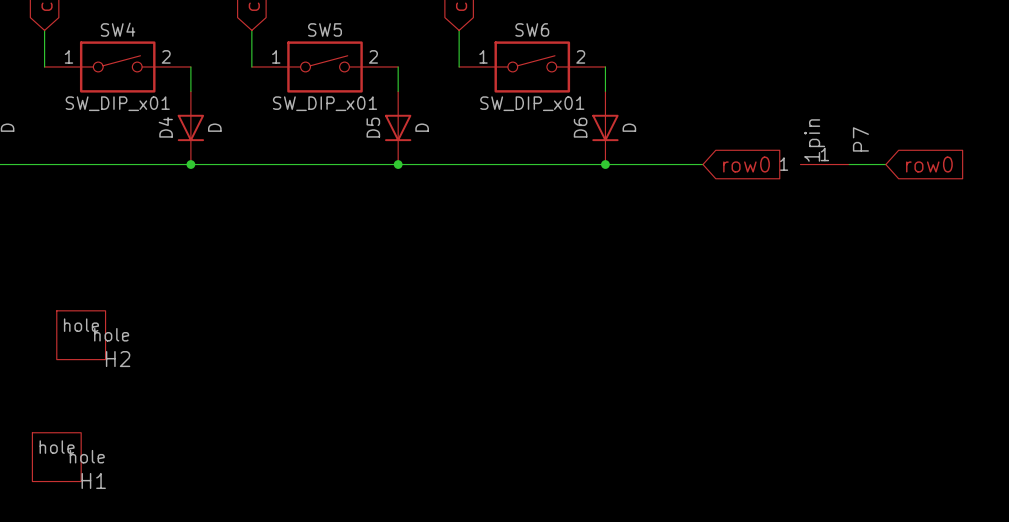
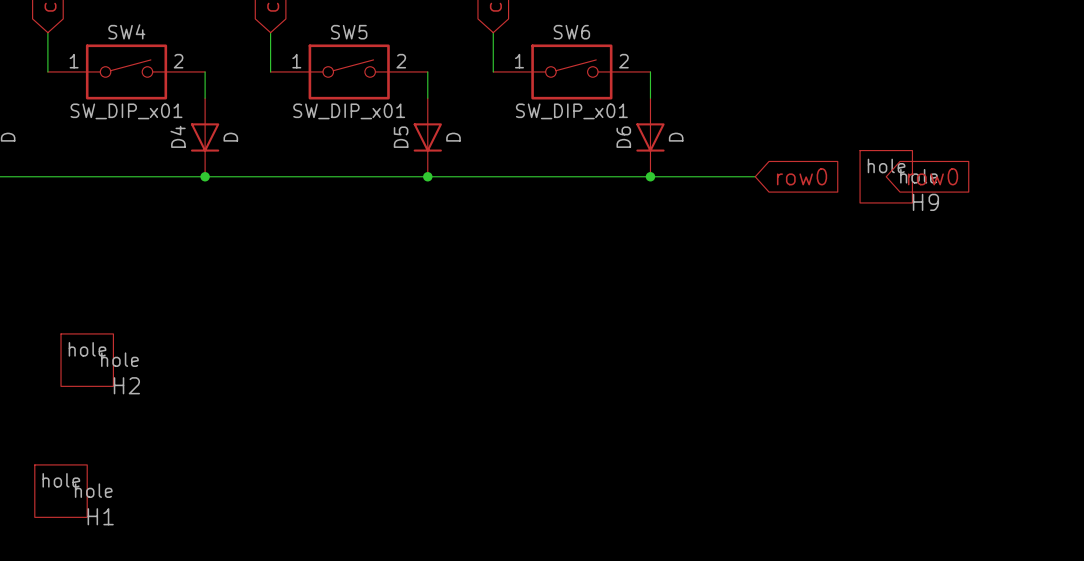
P7: 1pin (824, 164) -> none
H9: none -> (886, 176)
wire: (849, 164) (885, 164) -> none
global label position: row0 (929, 164) -> row0 (933, 176)

